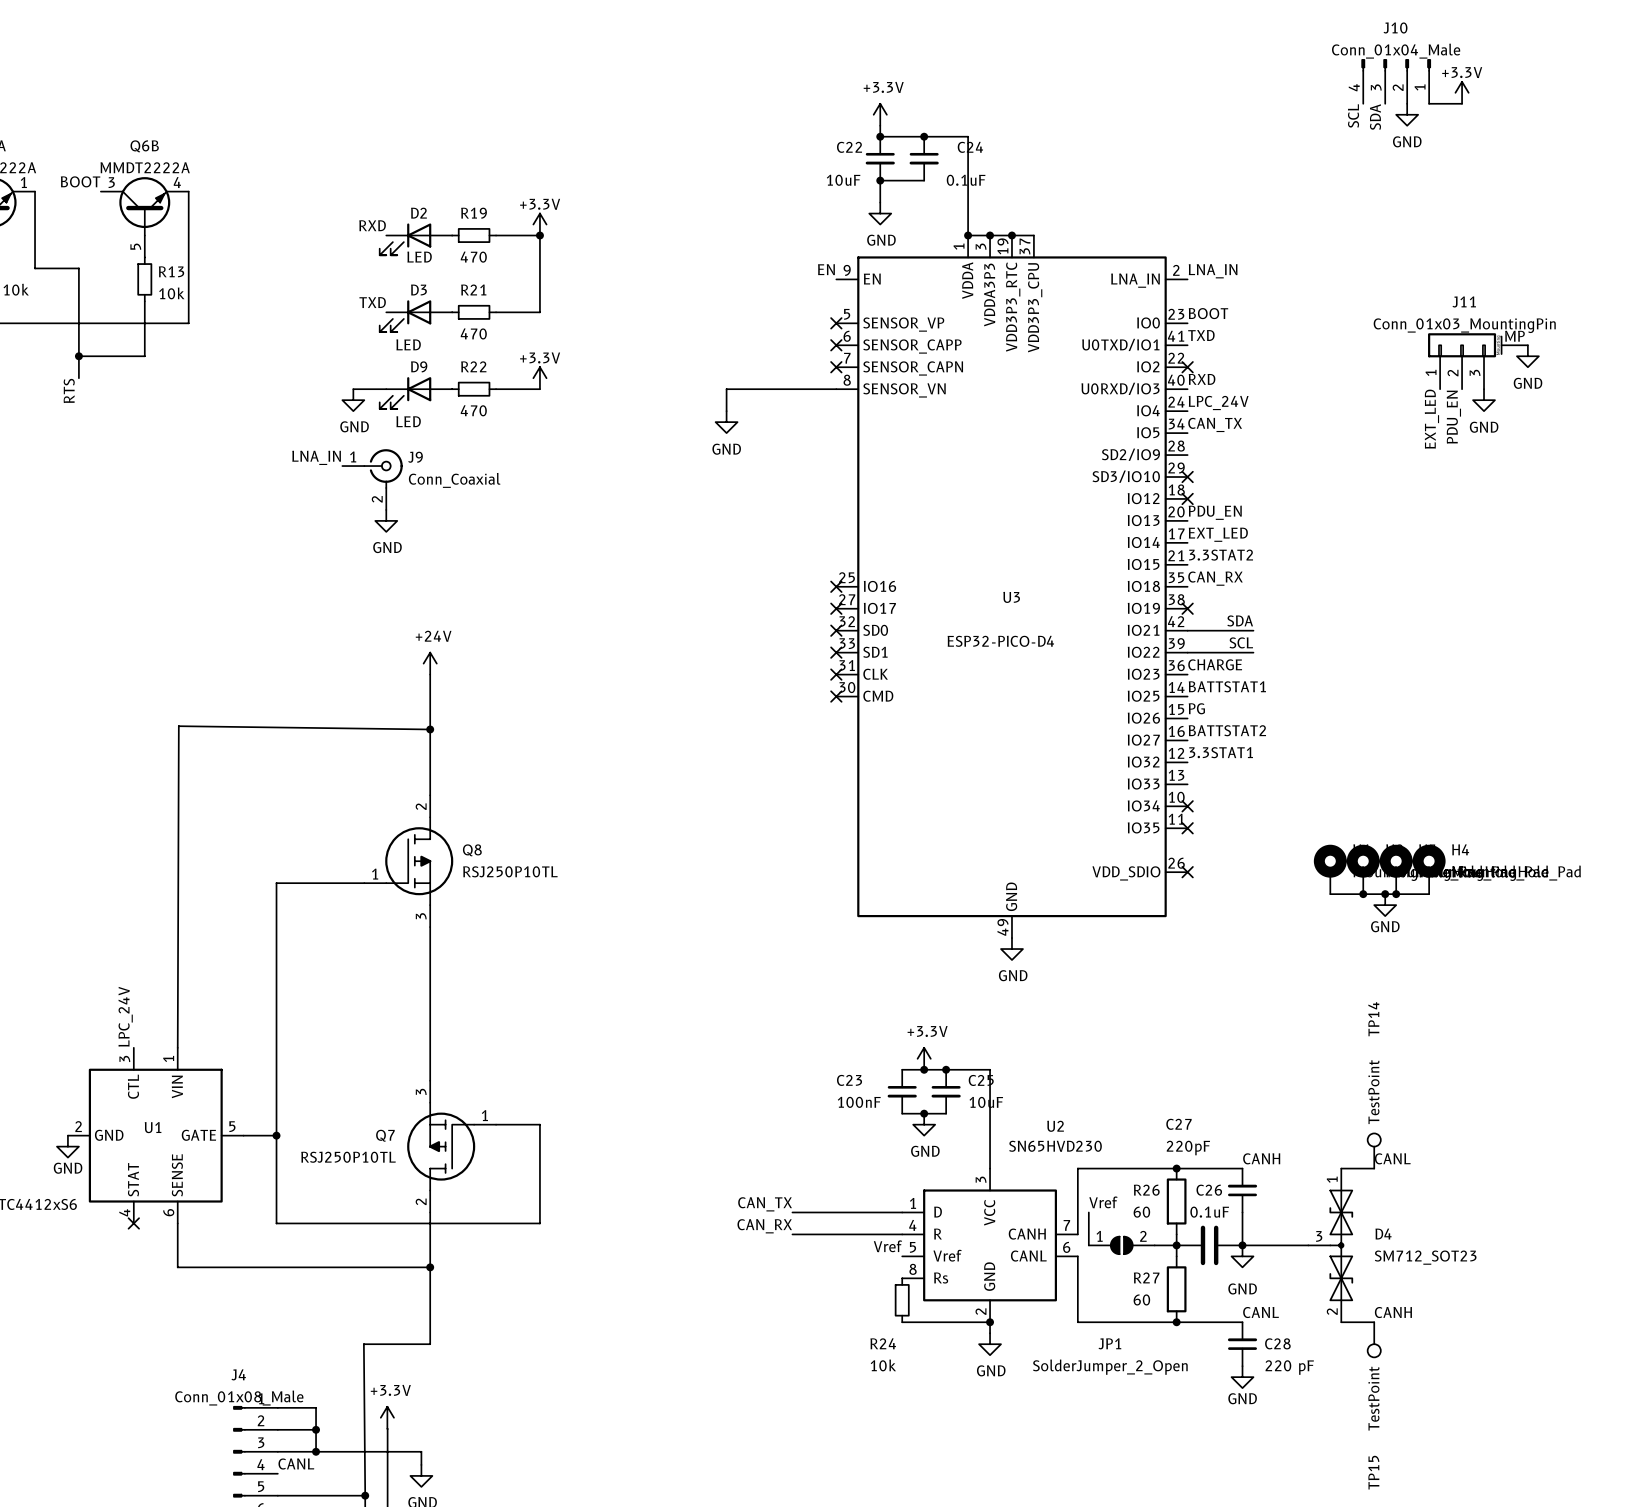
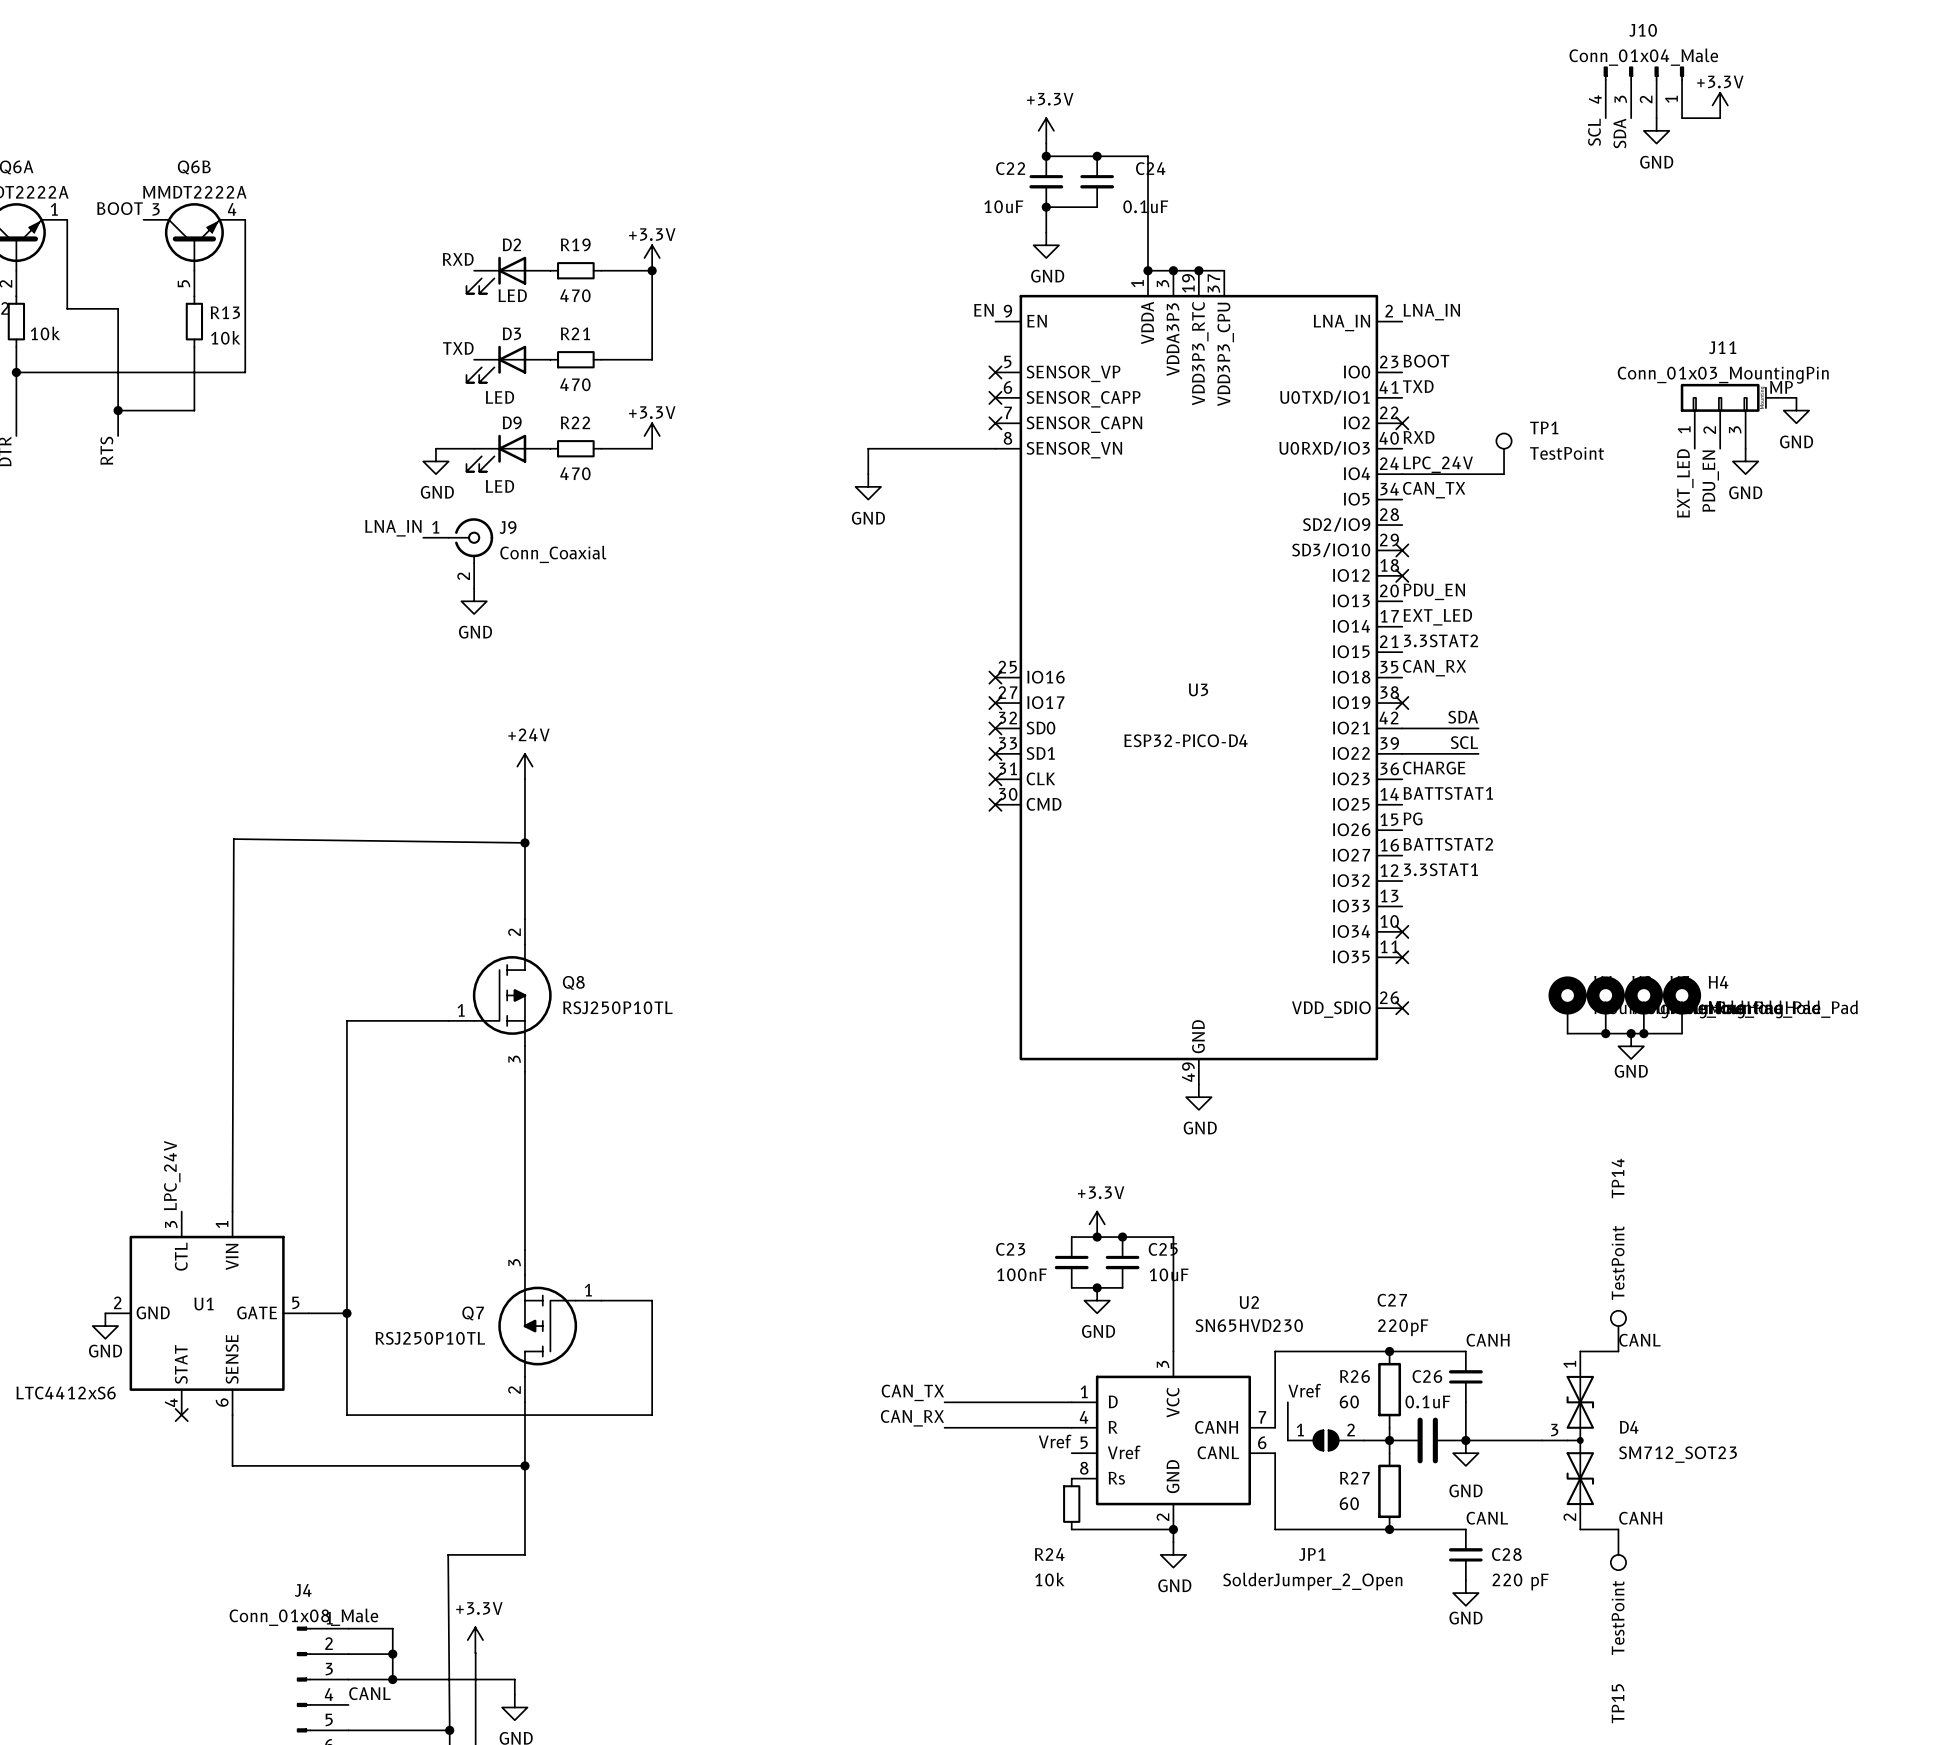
TP1: none -> TestPoint (1504, 453)
wire: none -> (1402, 474) (1504, 474)

